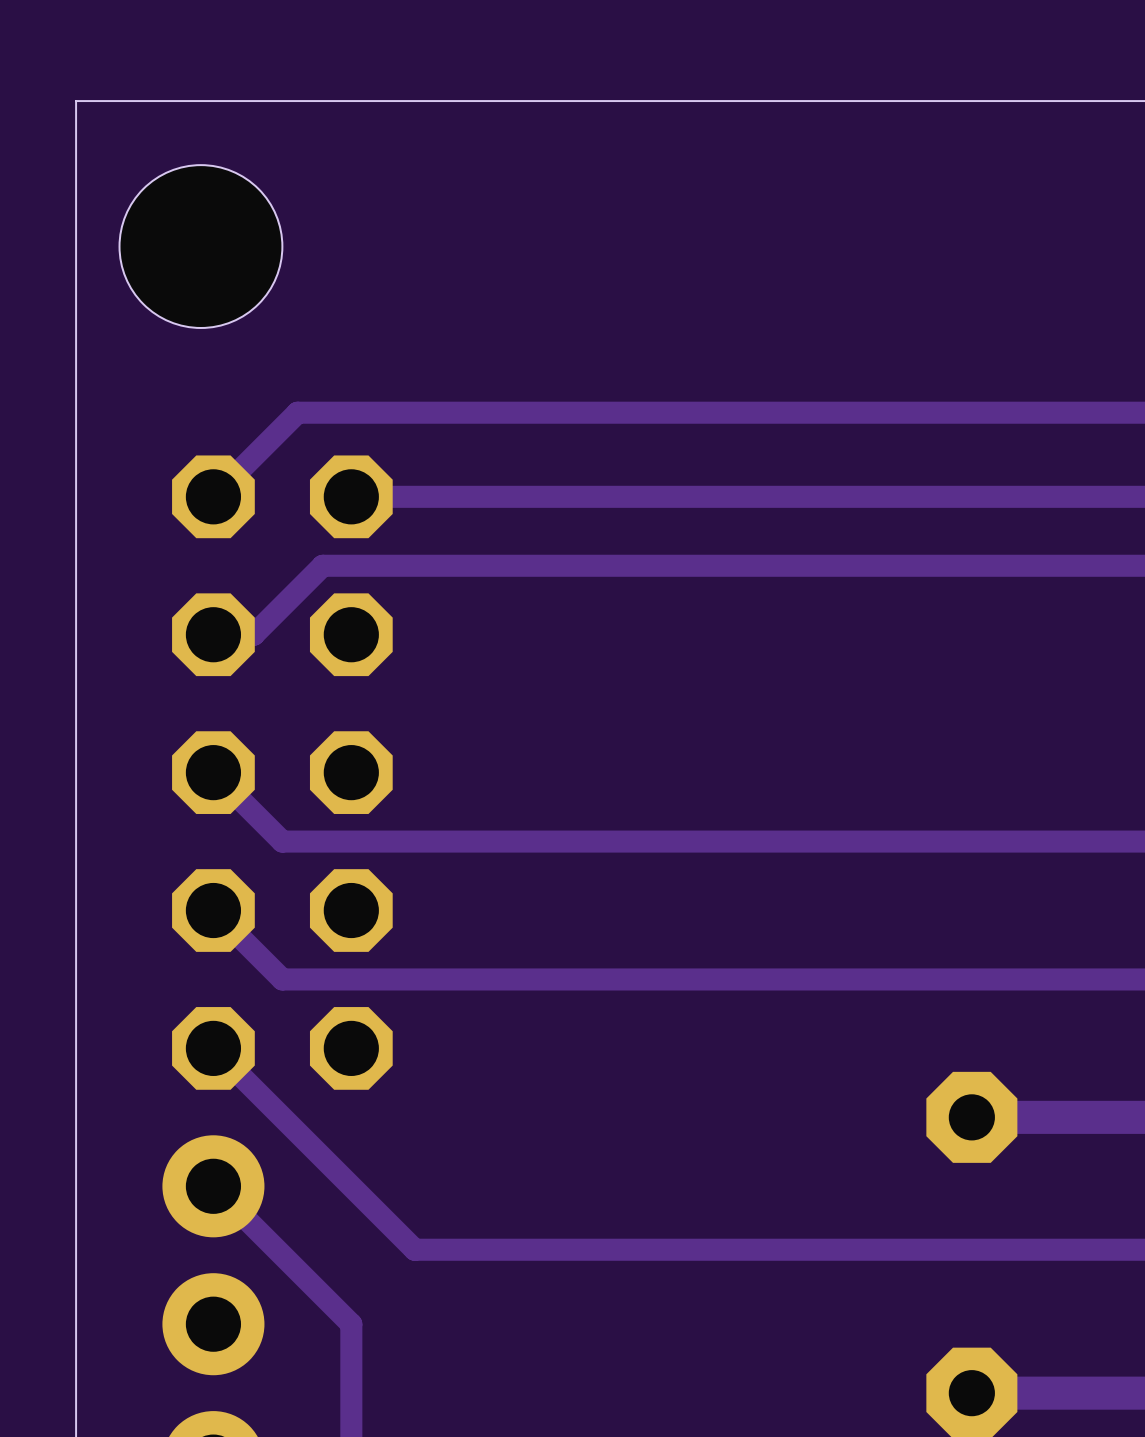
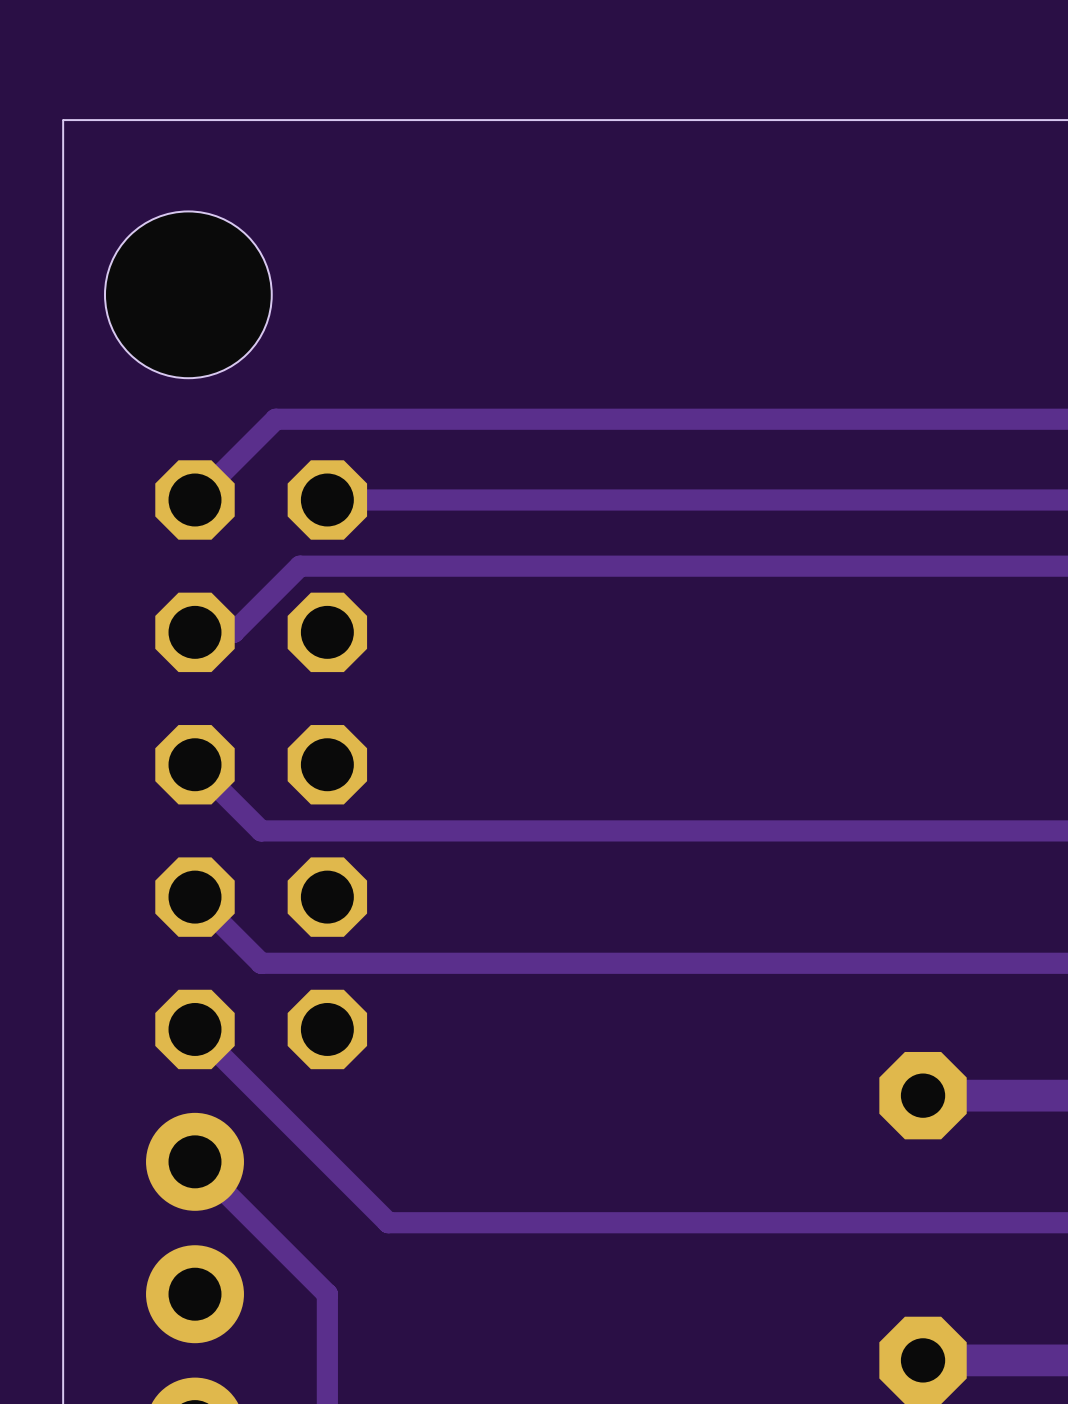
hole position: (200, 246) -> (188, 294)

